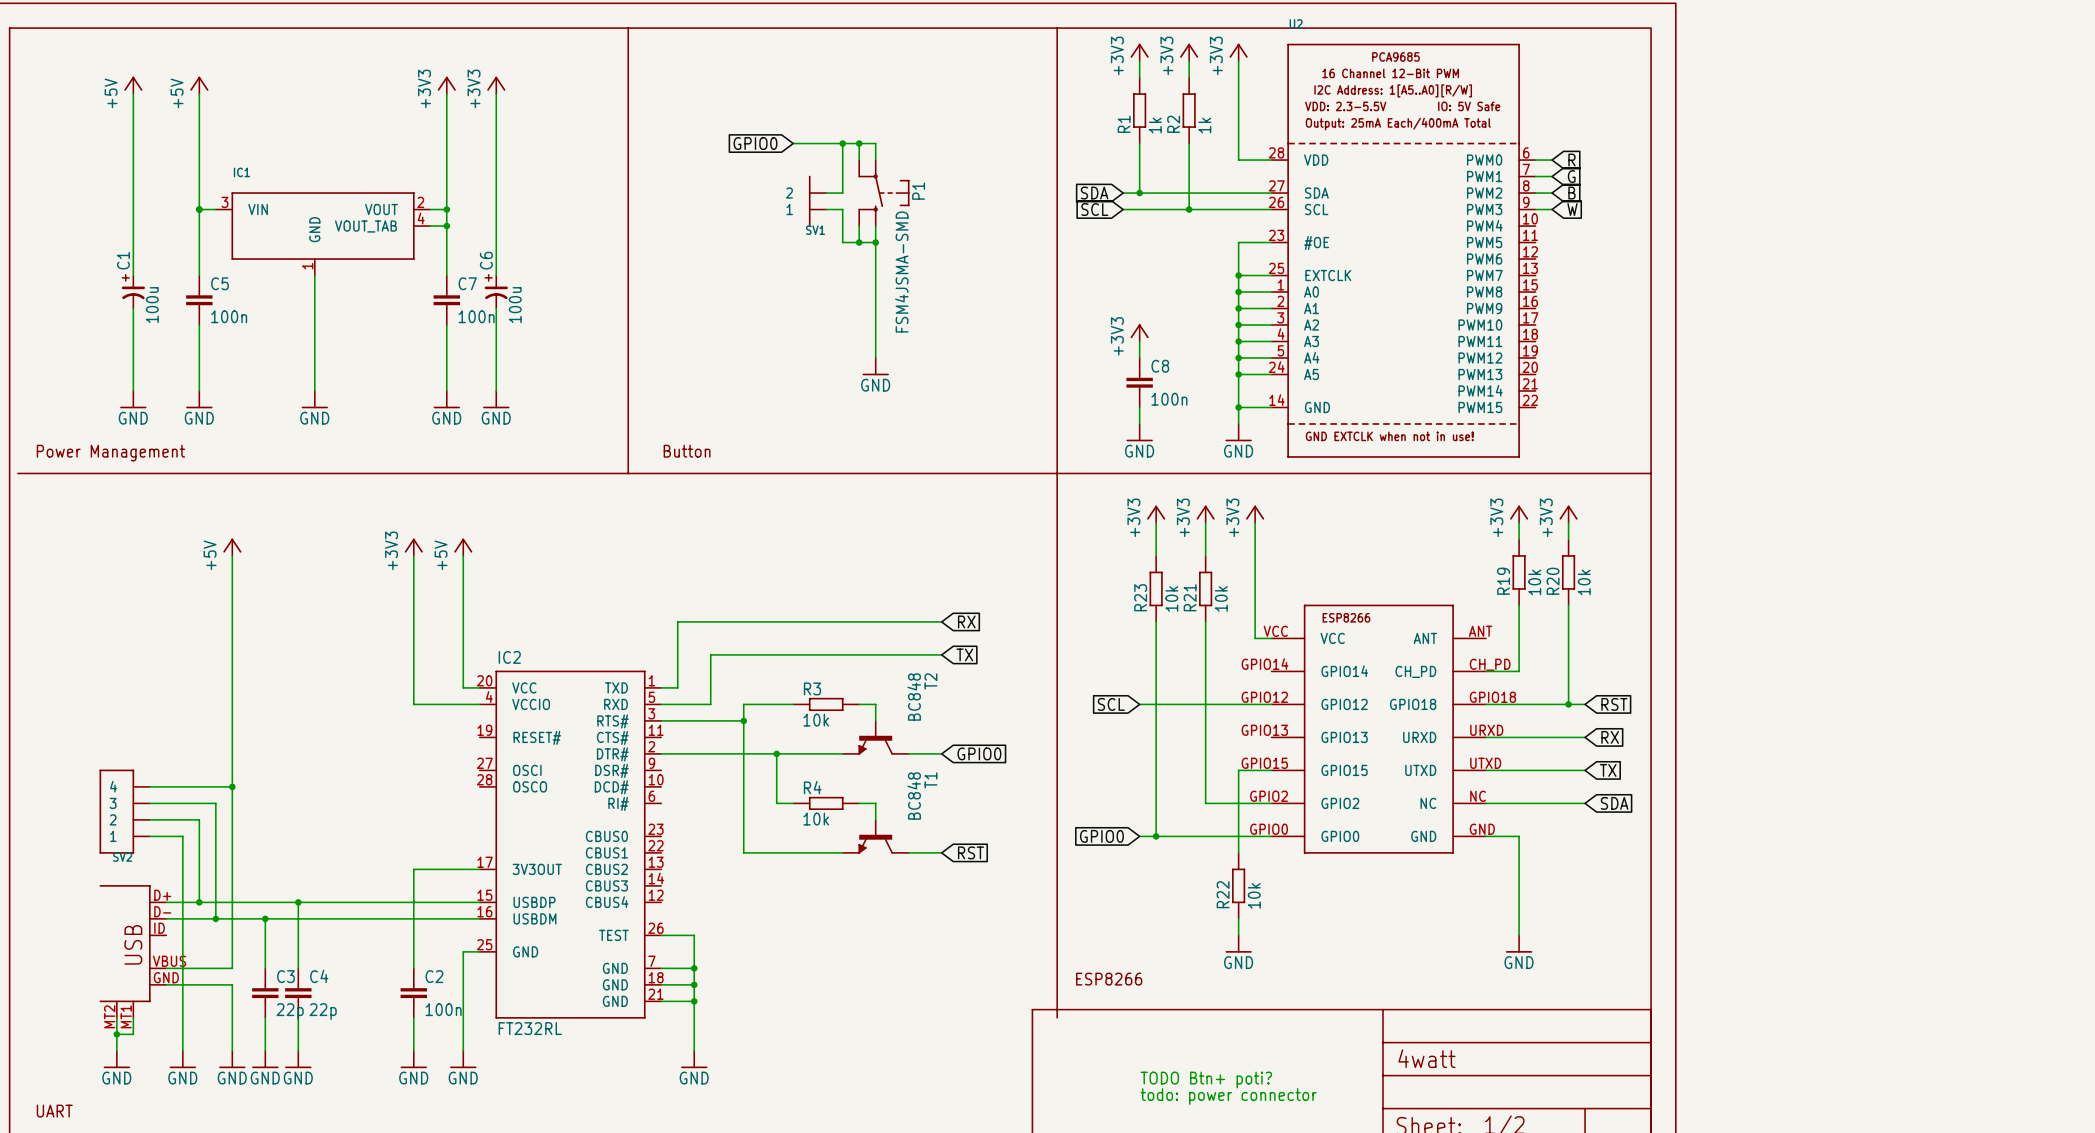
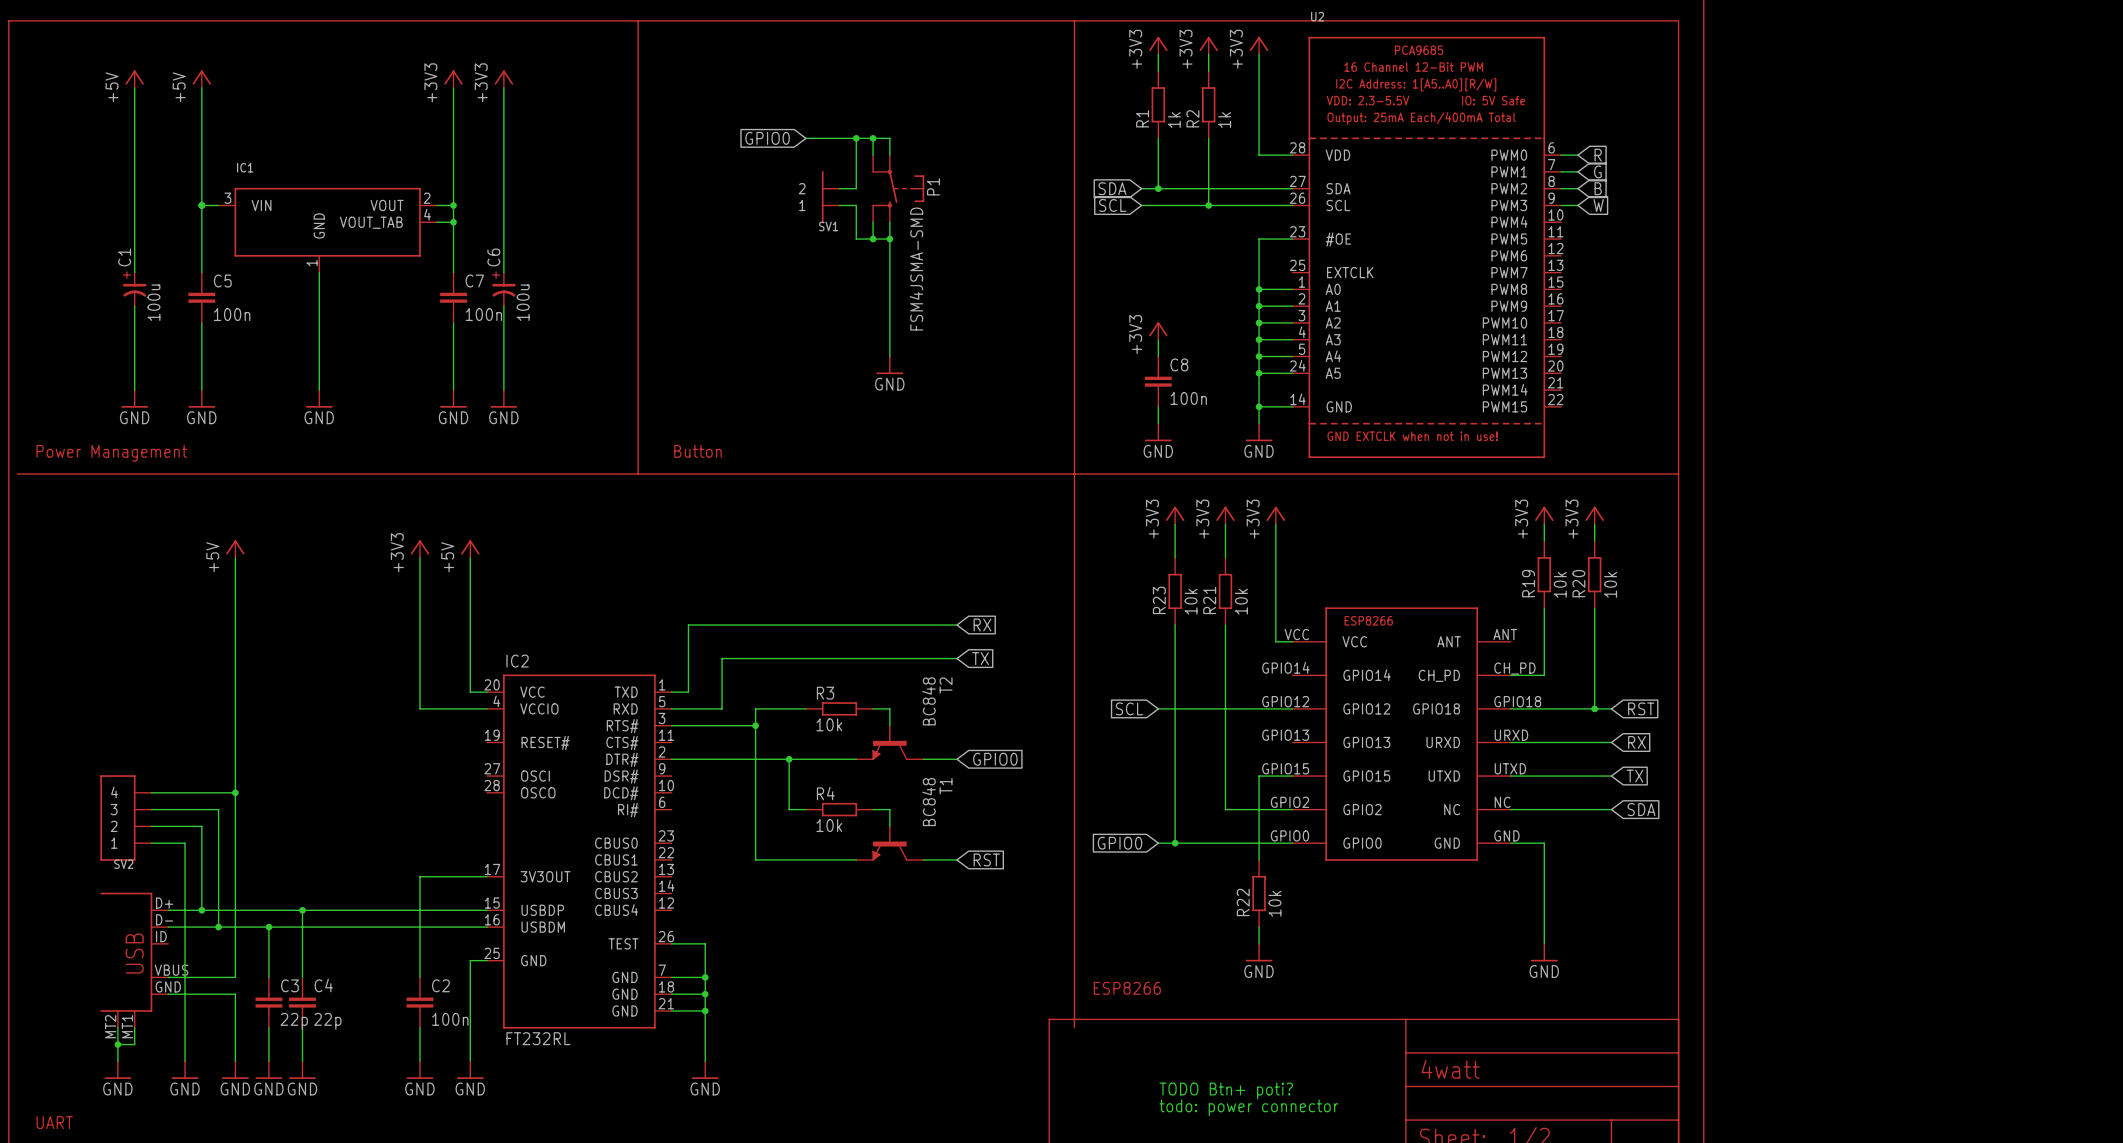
wire: (1238, 275) (1271, 275) -> none
junction: (1238, 275) -> none

